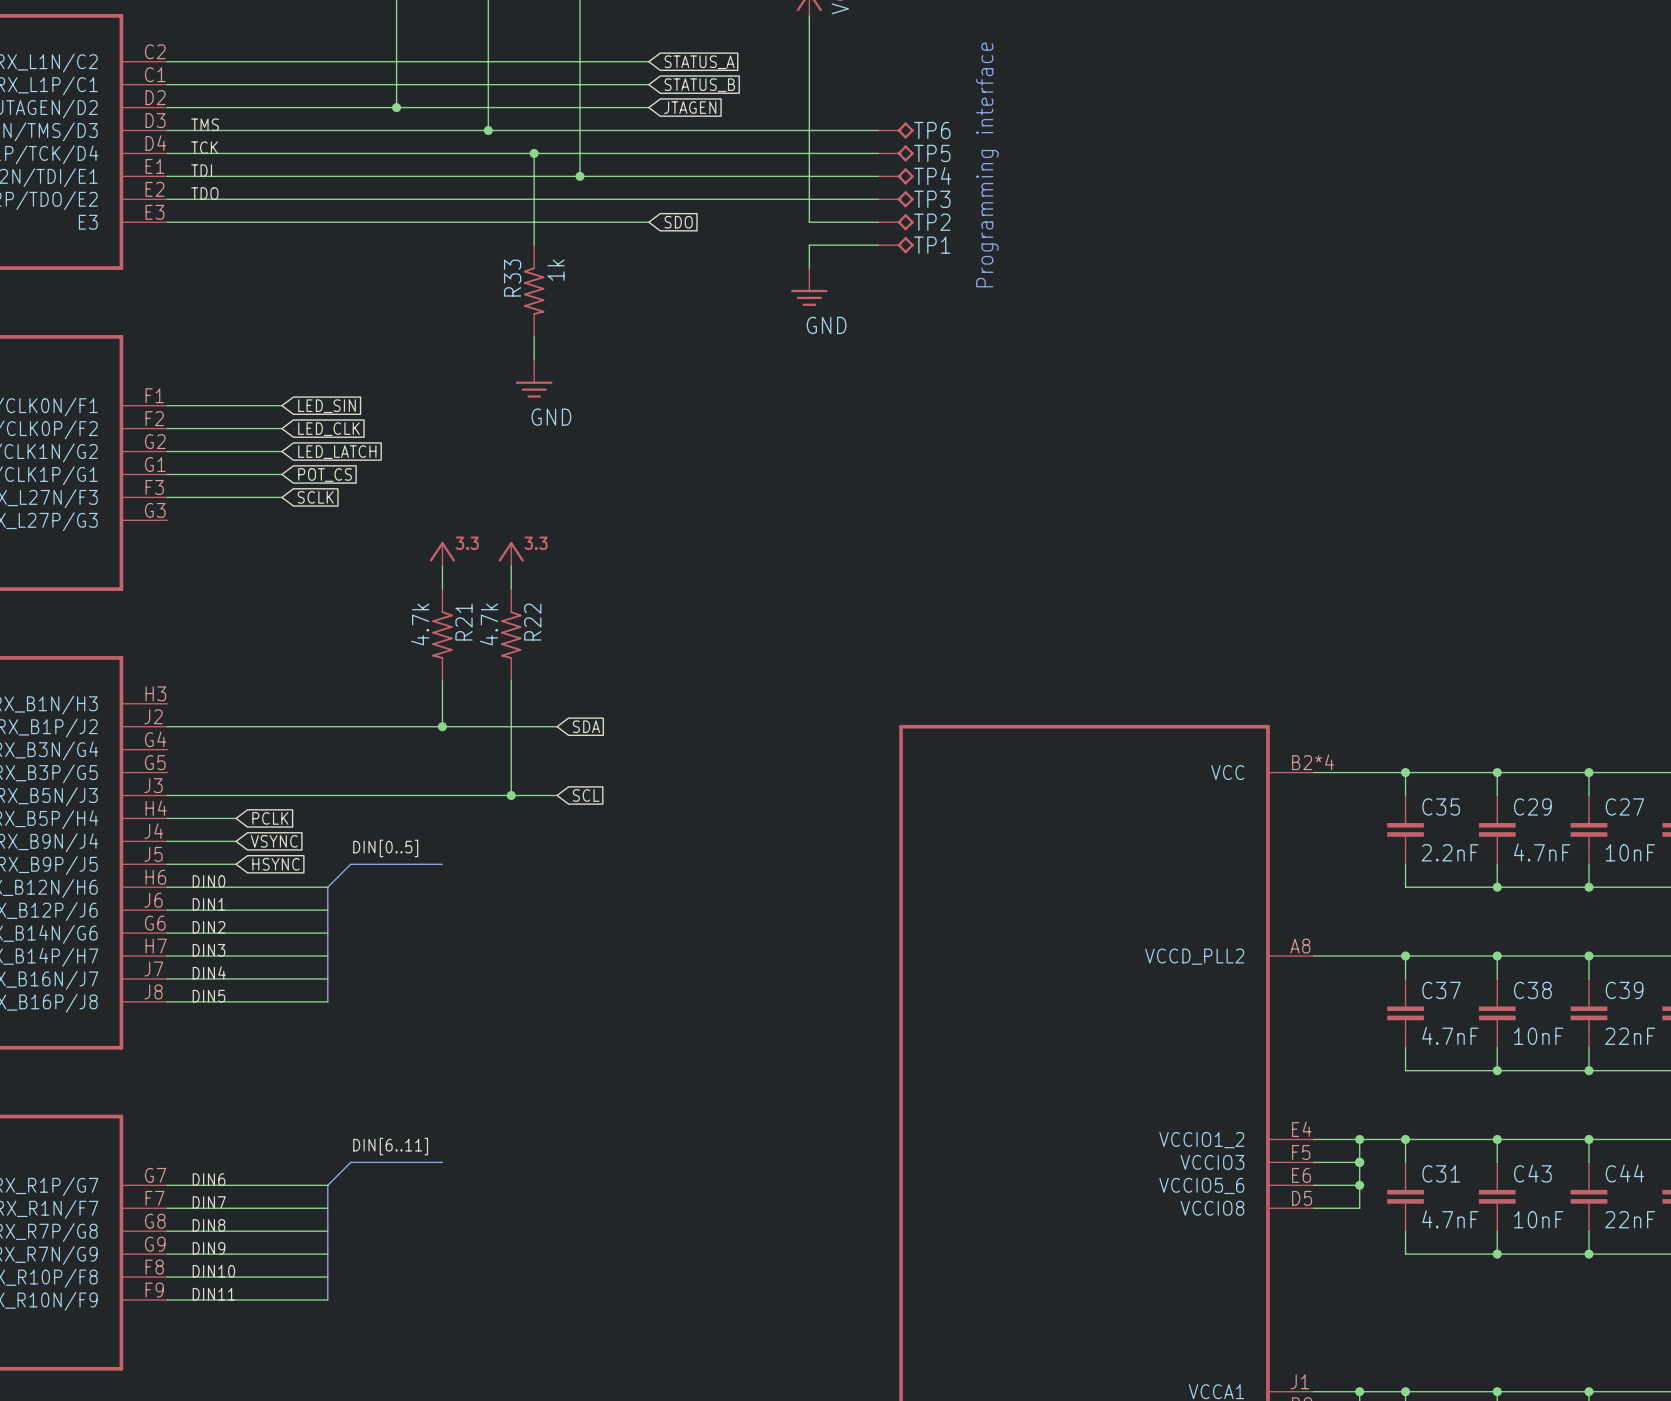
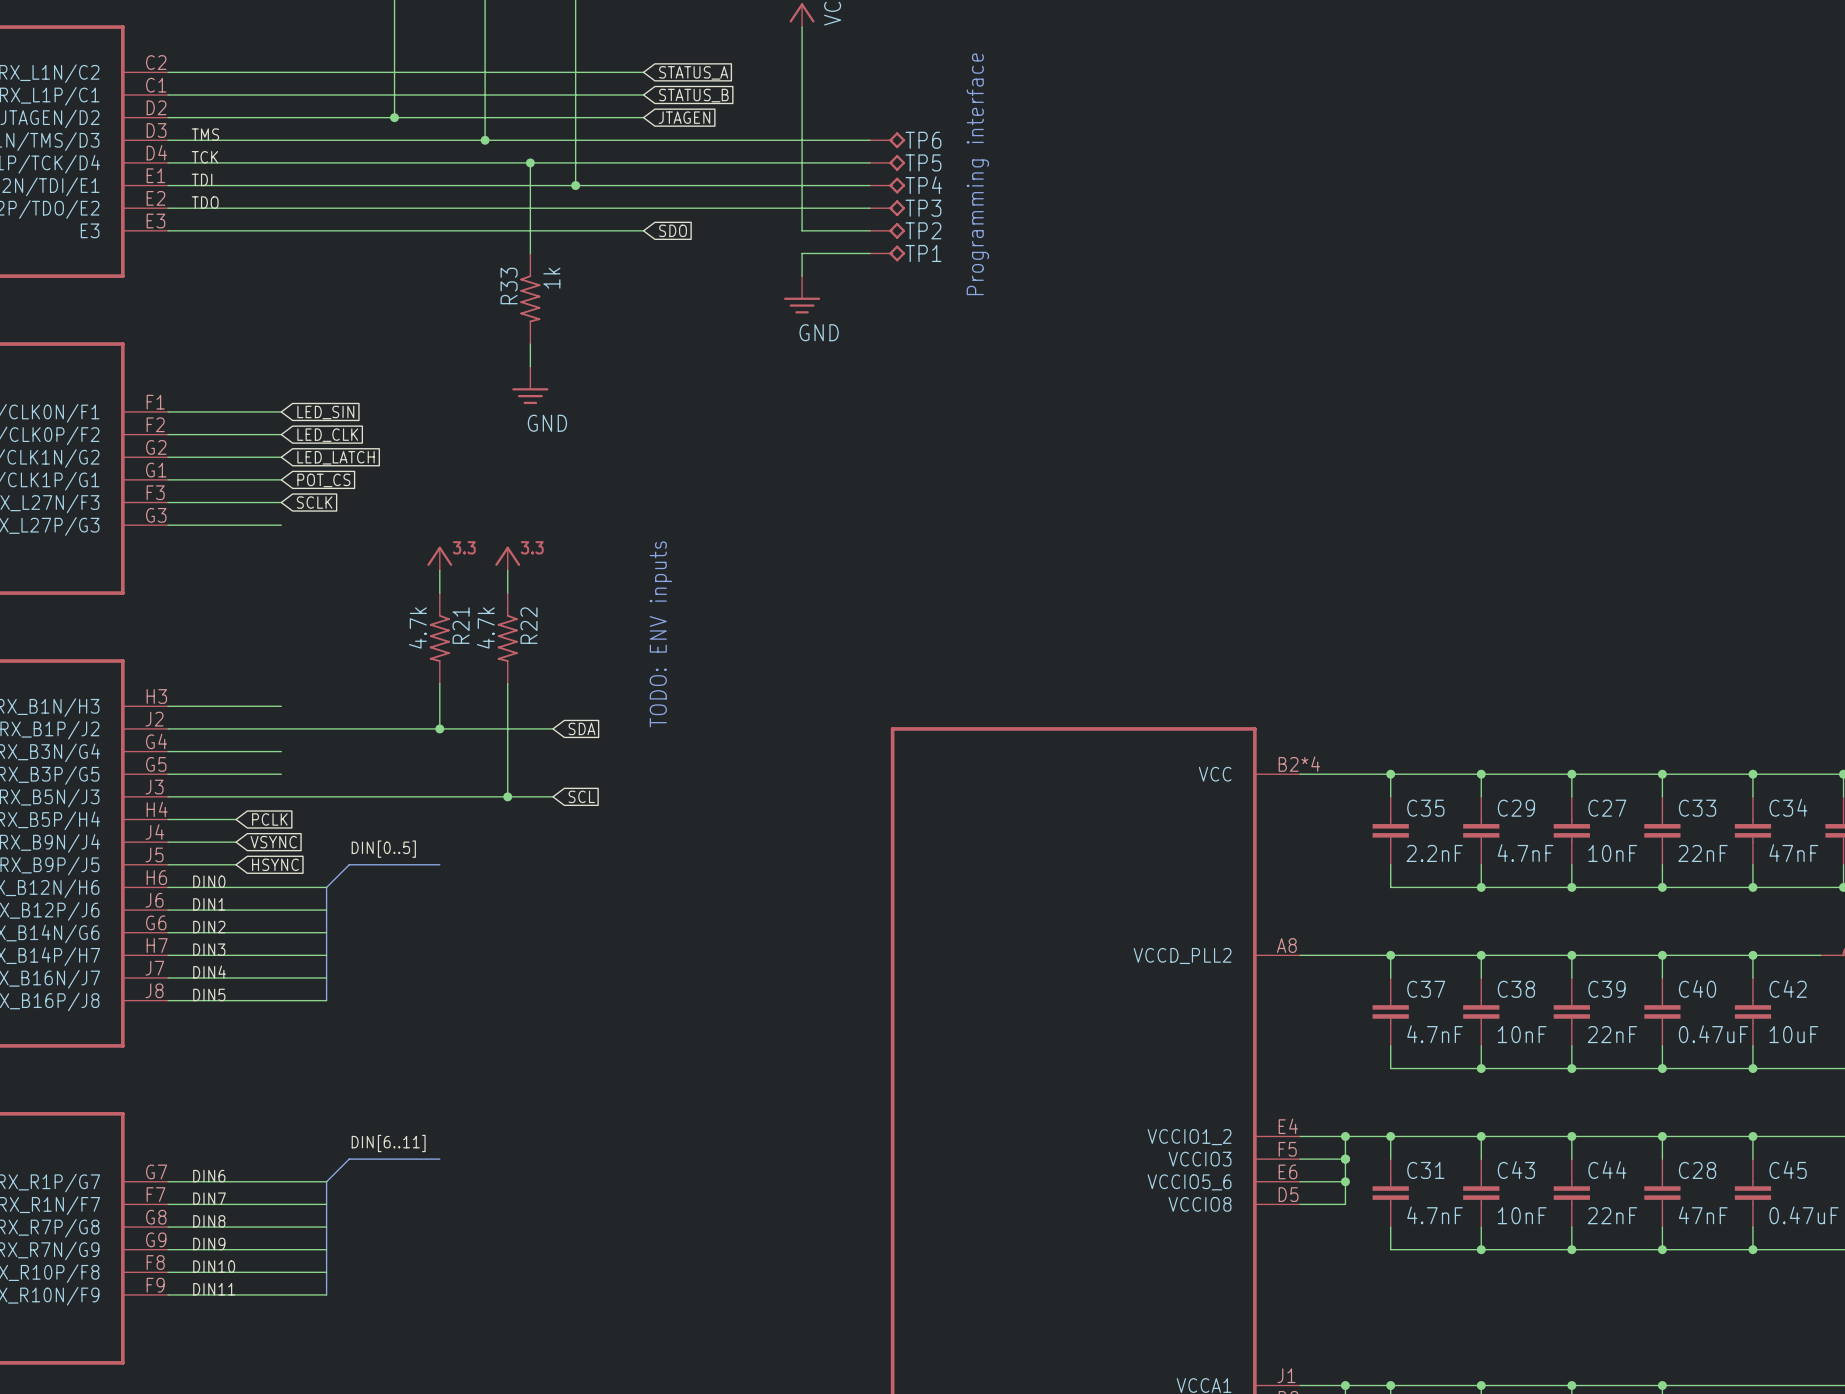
wire: none -> (168, 525) (281, 525)
text: none -> TODO: ENV inputs (660, 634)
wire: none -> (168, 706) (281, 706)
wire: none -> (168, 751) (281, 751)
wire: none -> (168, 774) (281, 774)

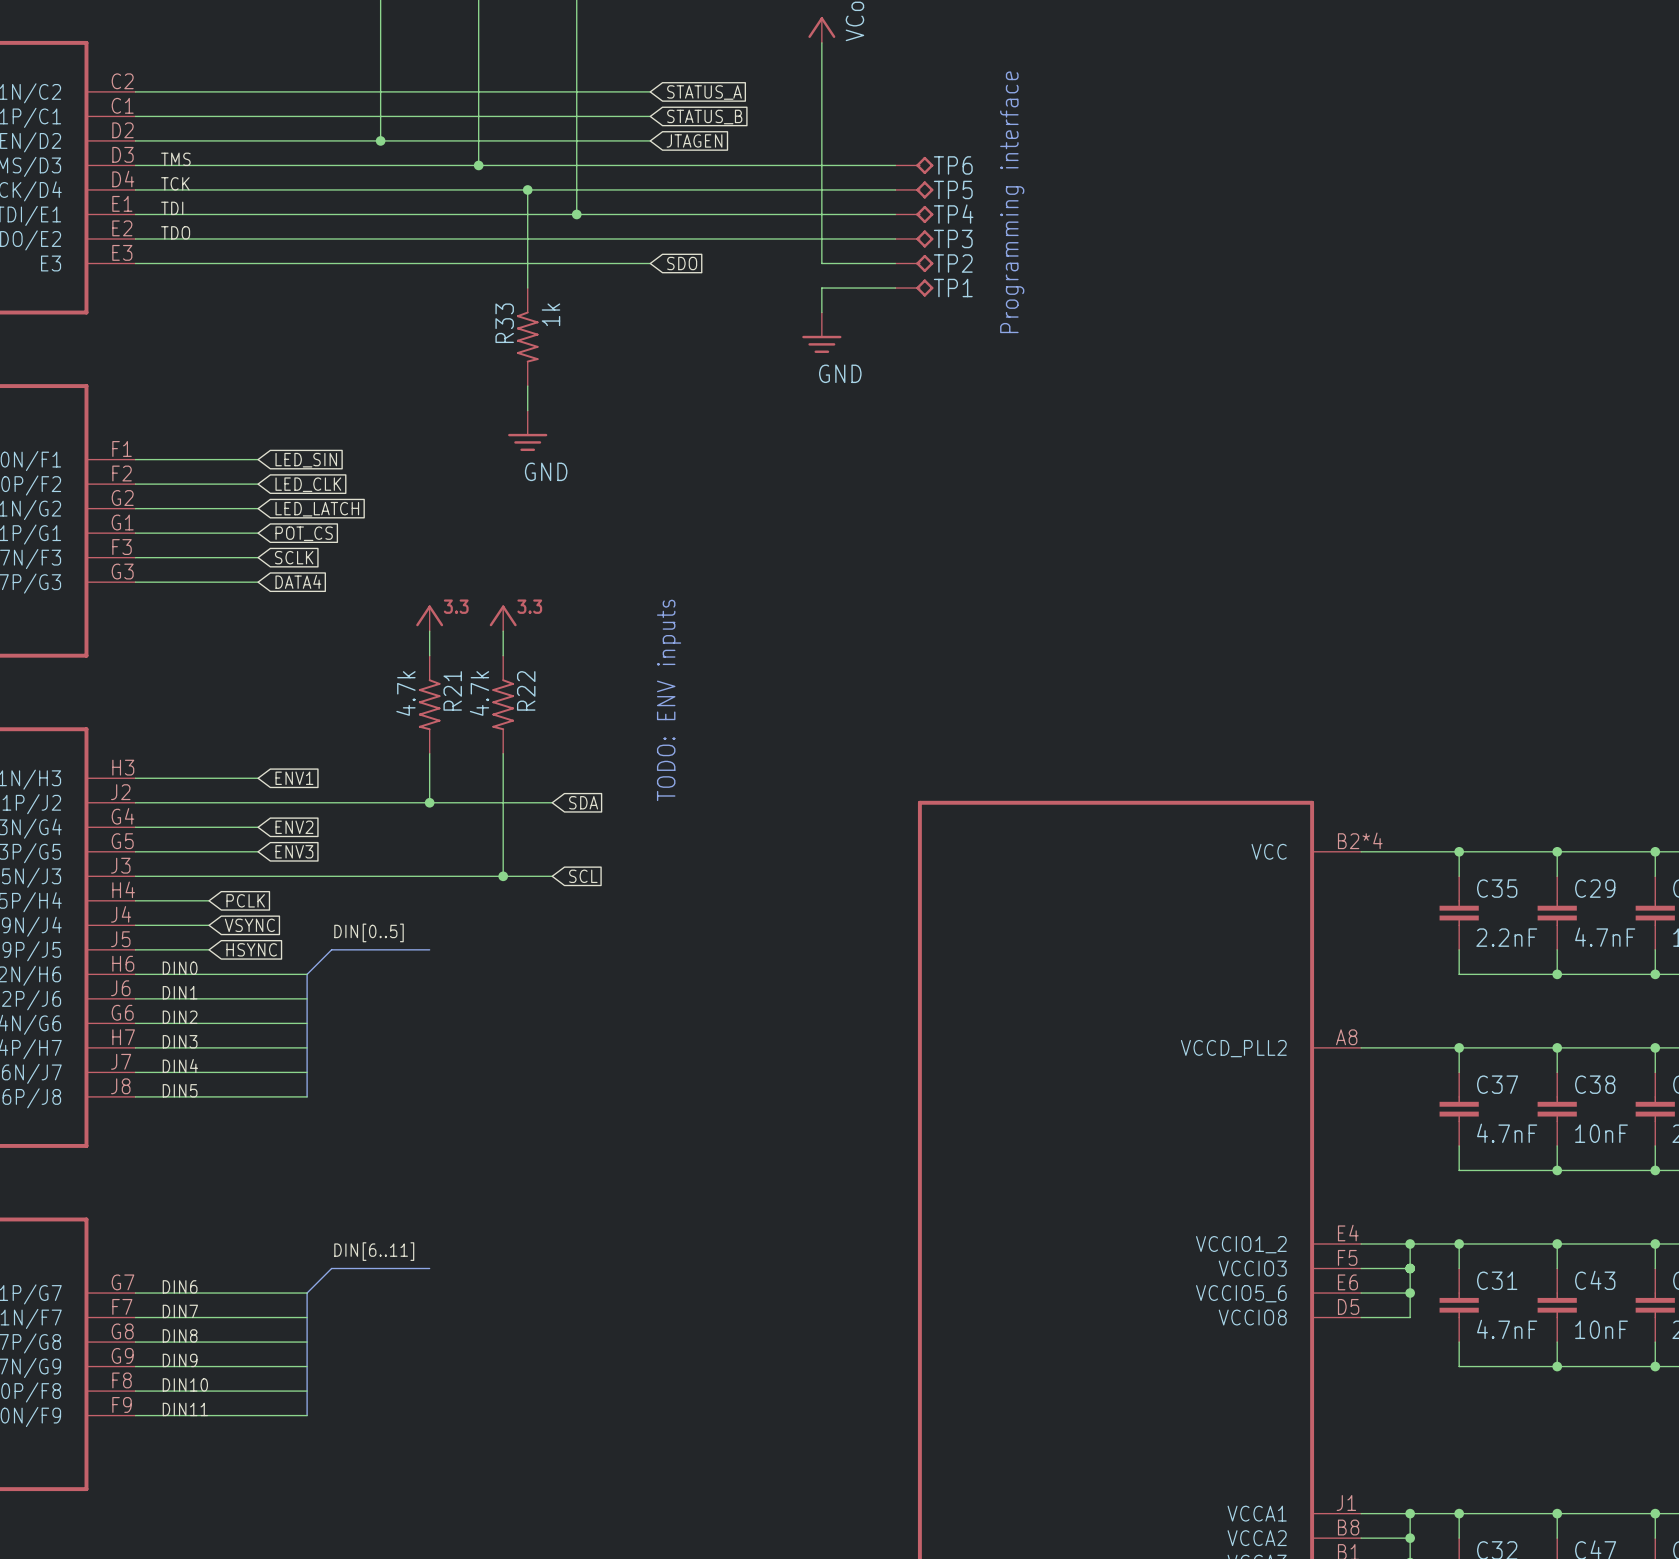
global label: none -> DATA4 (298, 581)
global label: none -> ENV1 (294, 778)
global label: none -> ENV2 (294, 827)
global label: none -> ENV3 (294, 851)

